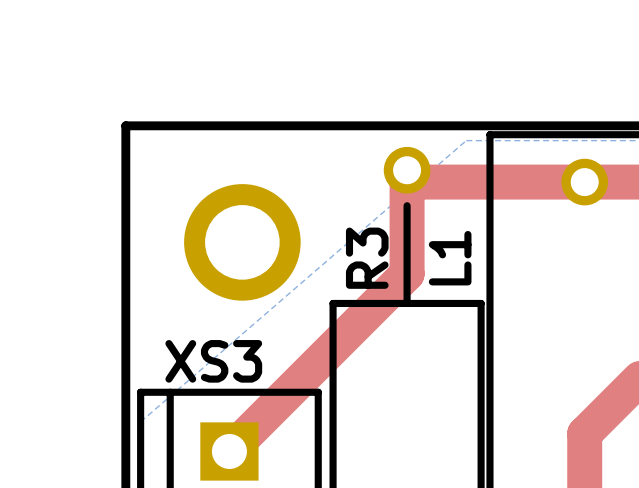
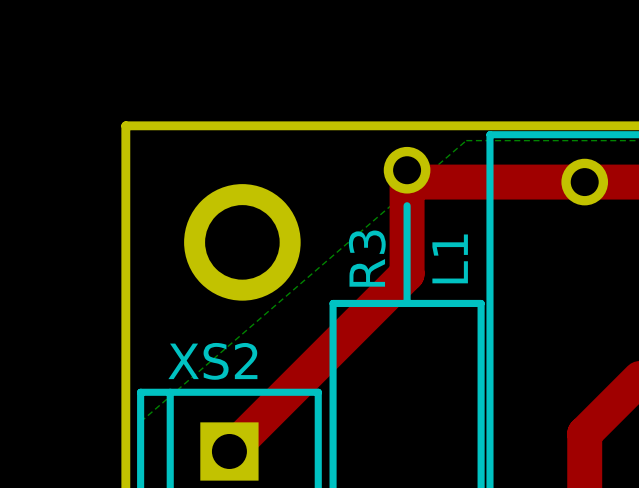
XS3 name: XS3 (213, 361) -> XS2 (212, 361)

